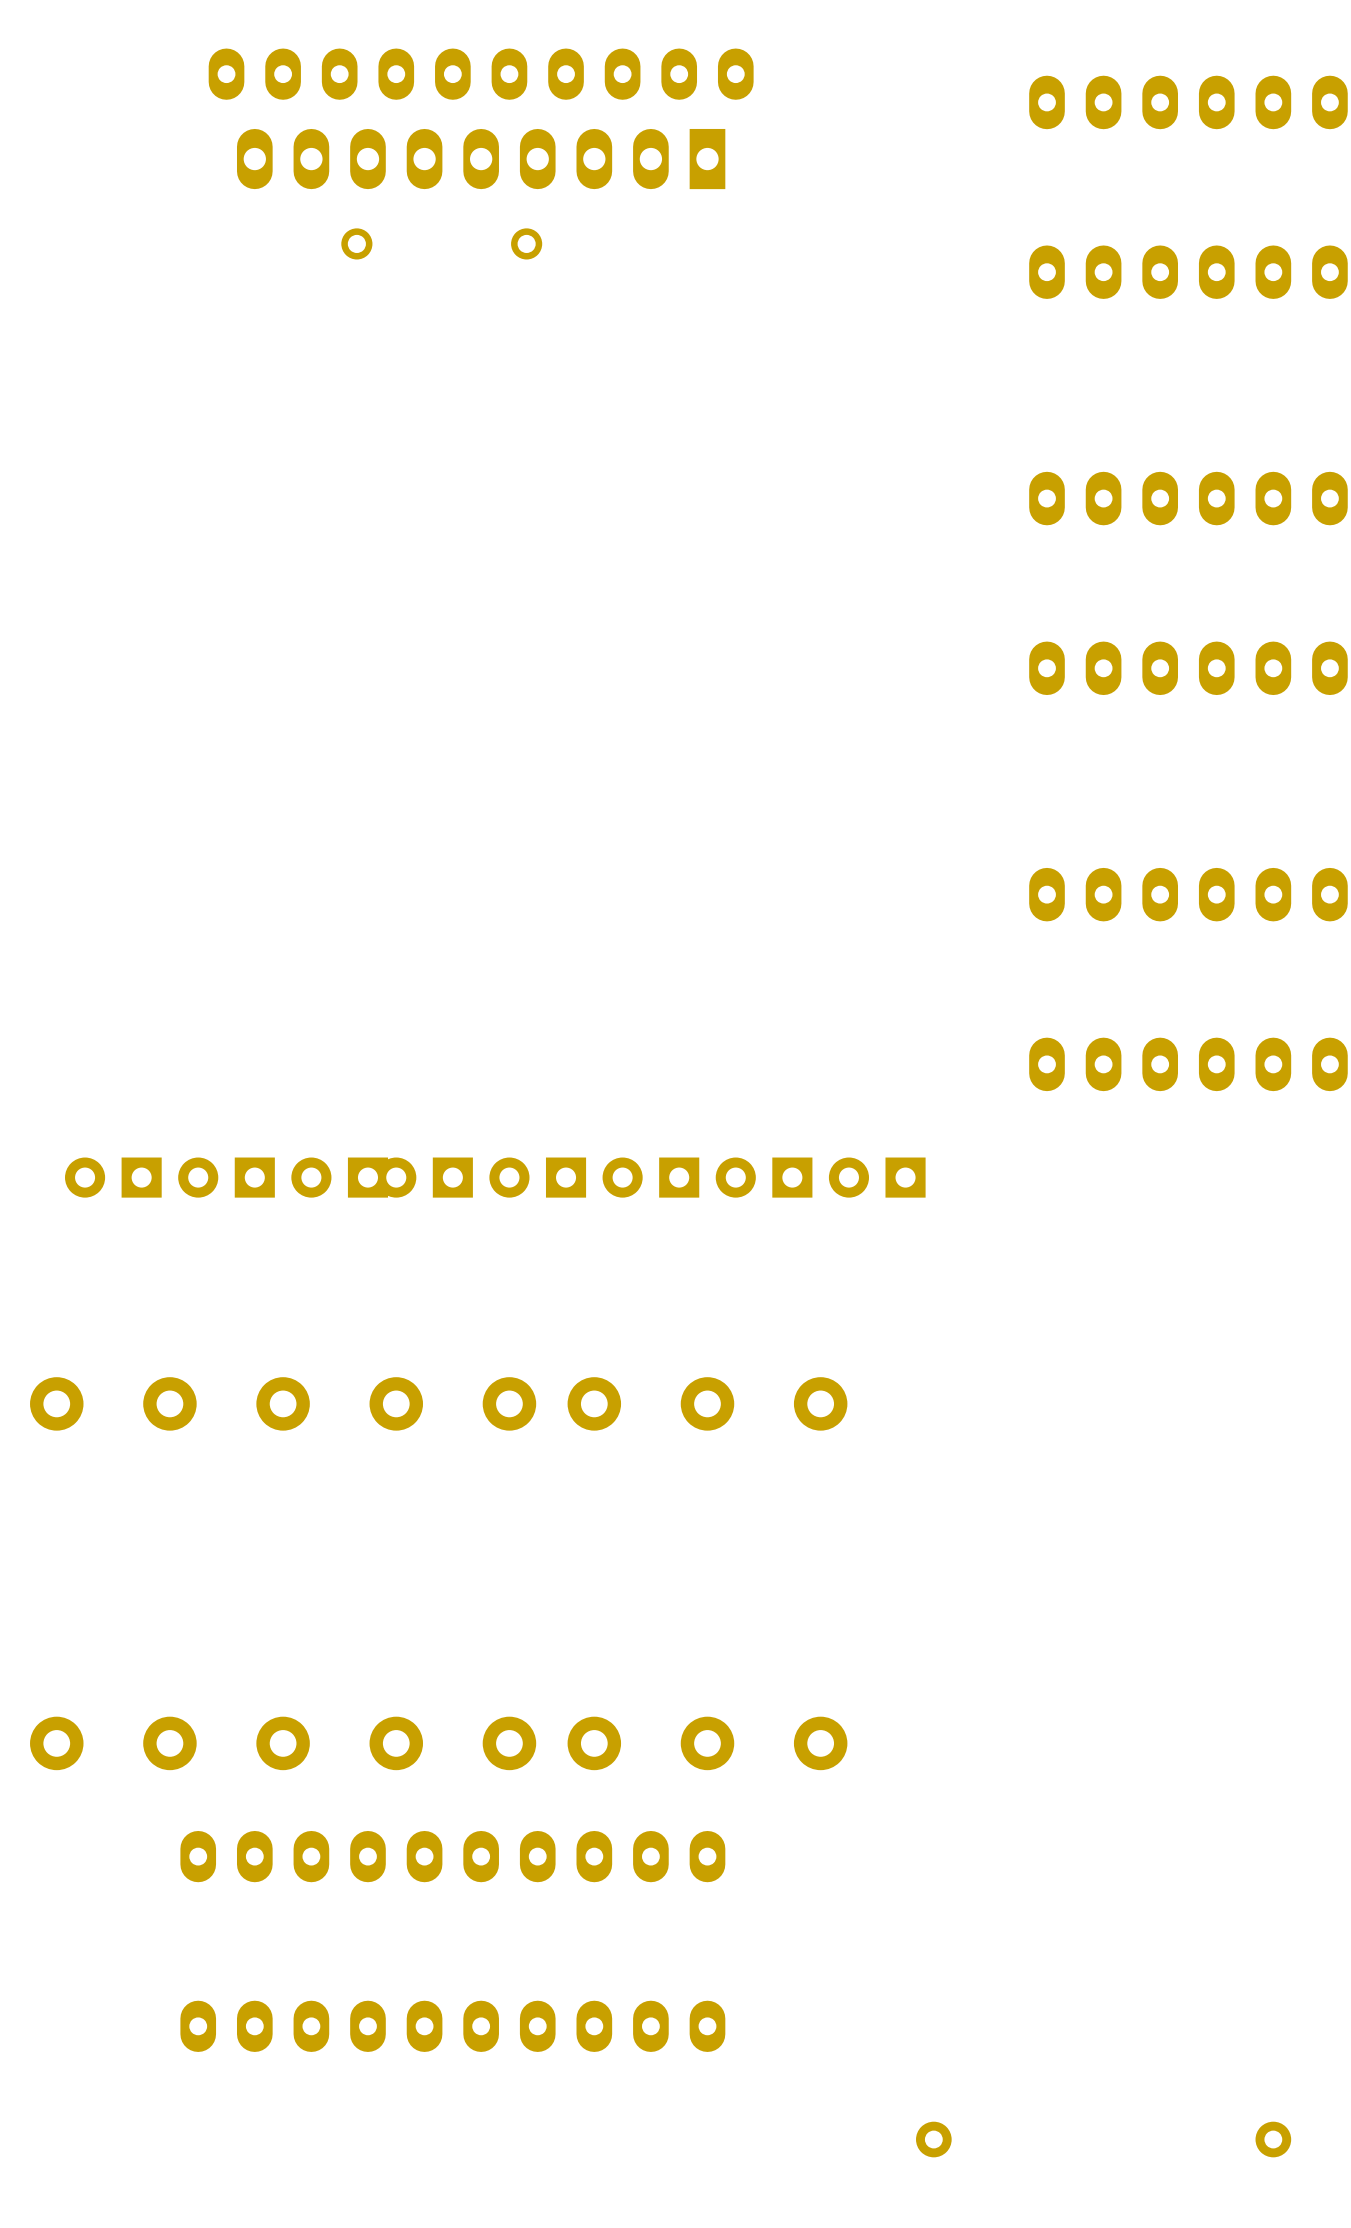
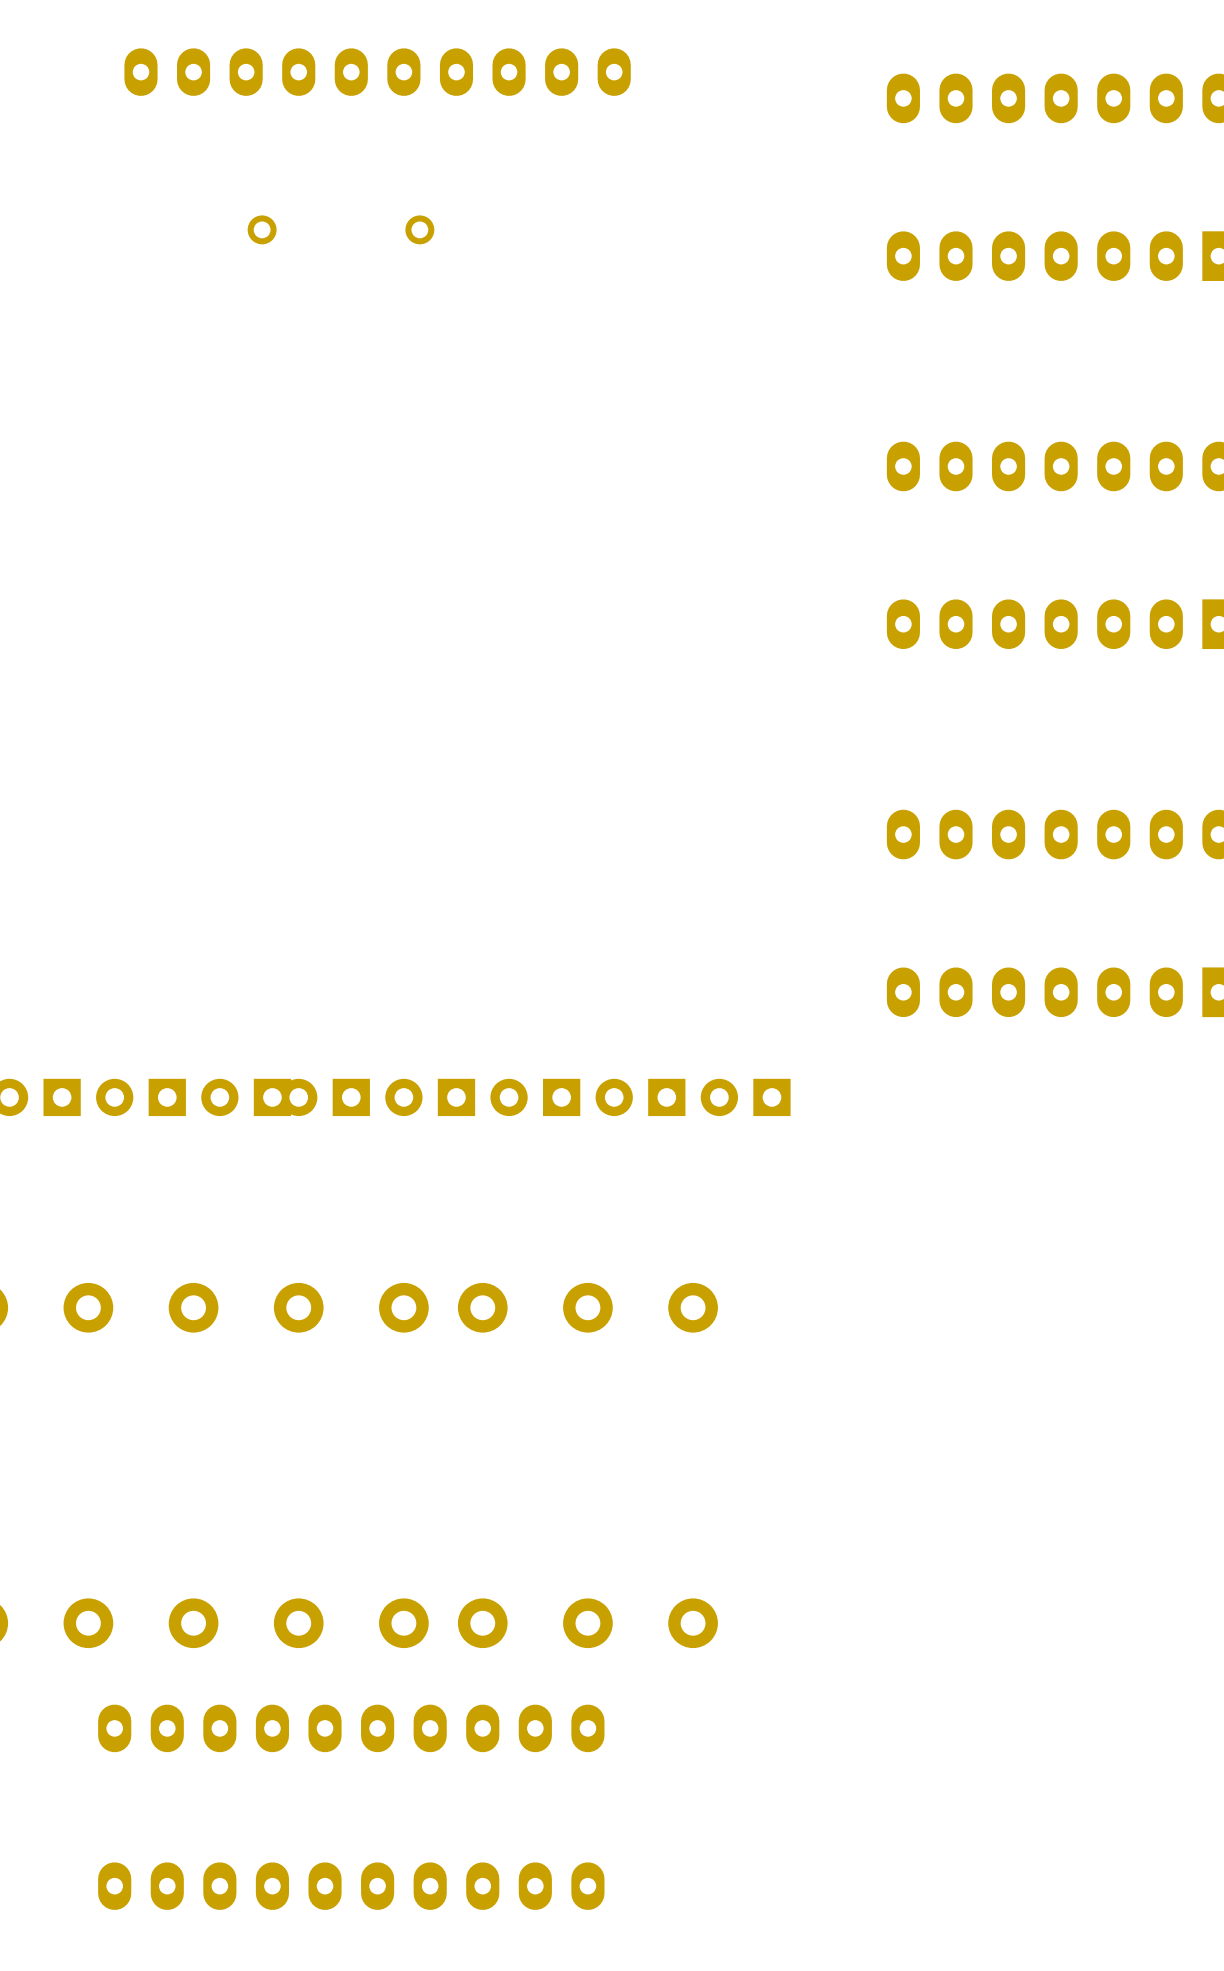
part: (481, 159) -> none

